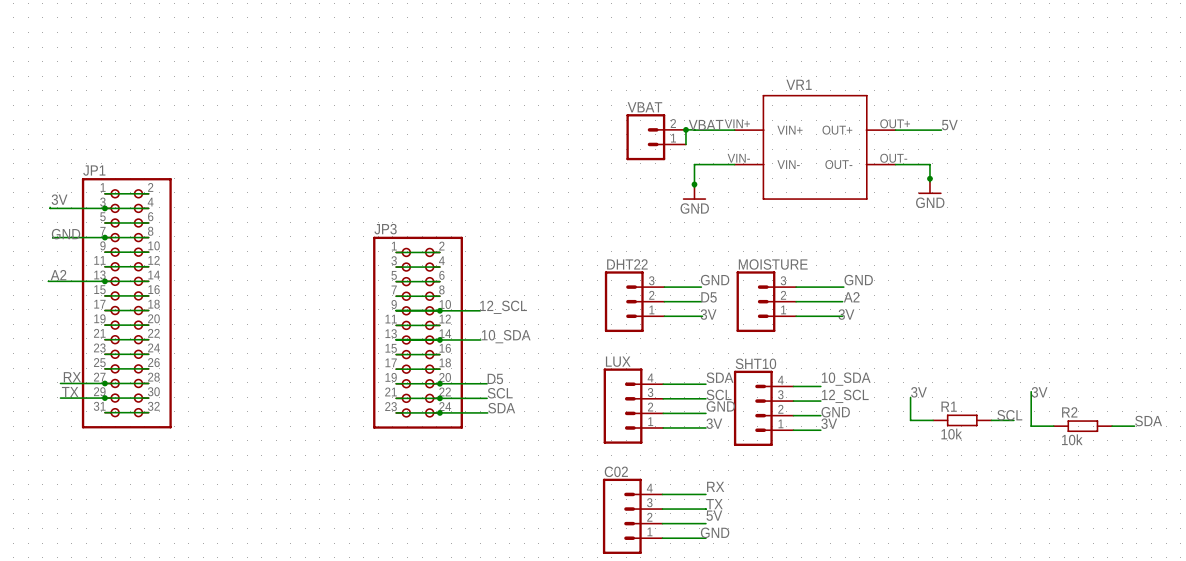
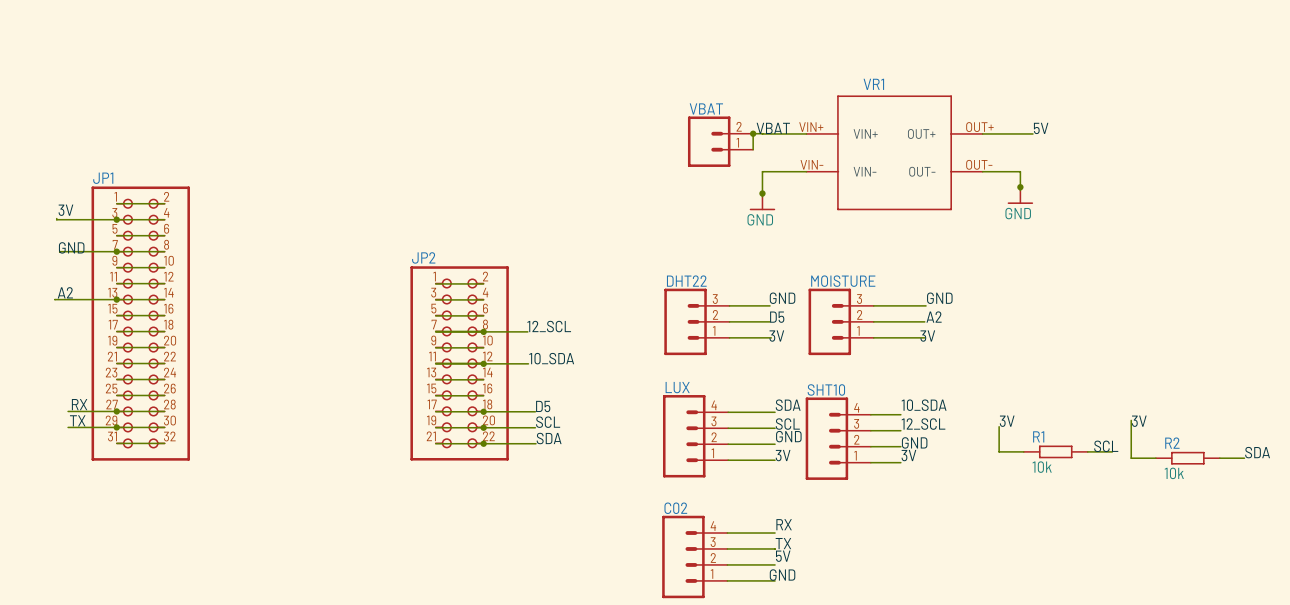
JP3: (418, 332) -> none
JP2: none -> (459, 363)

